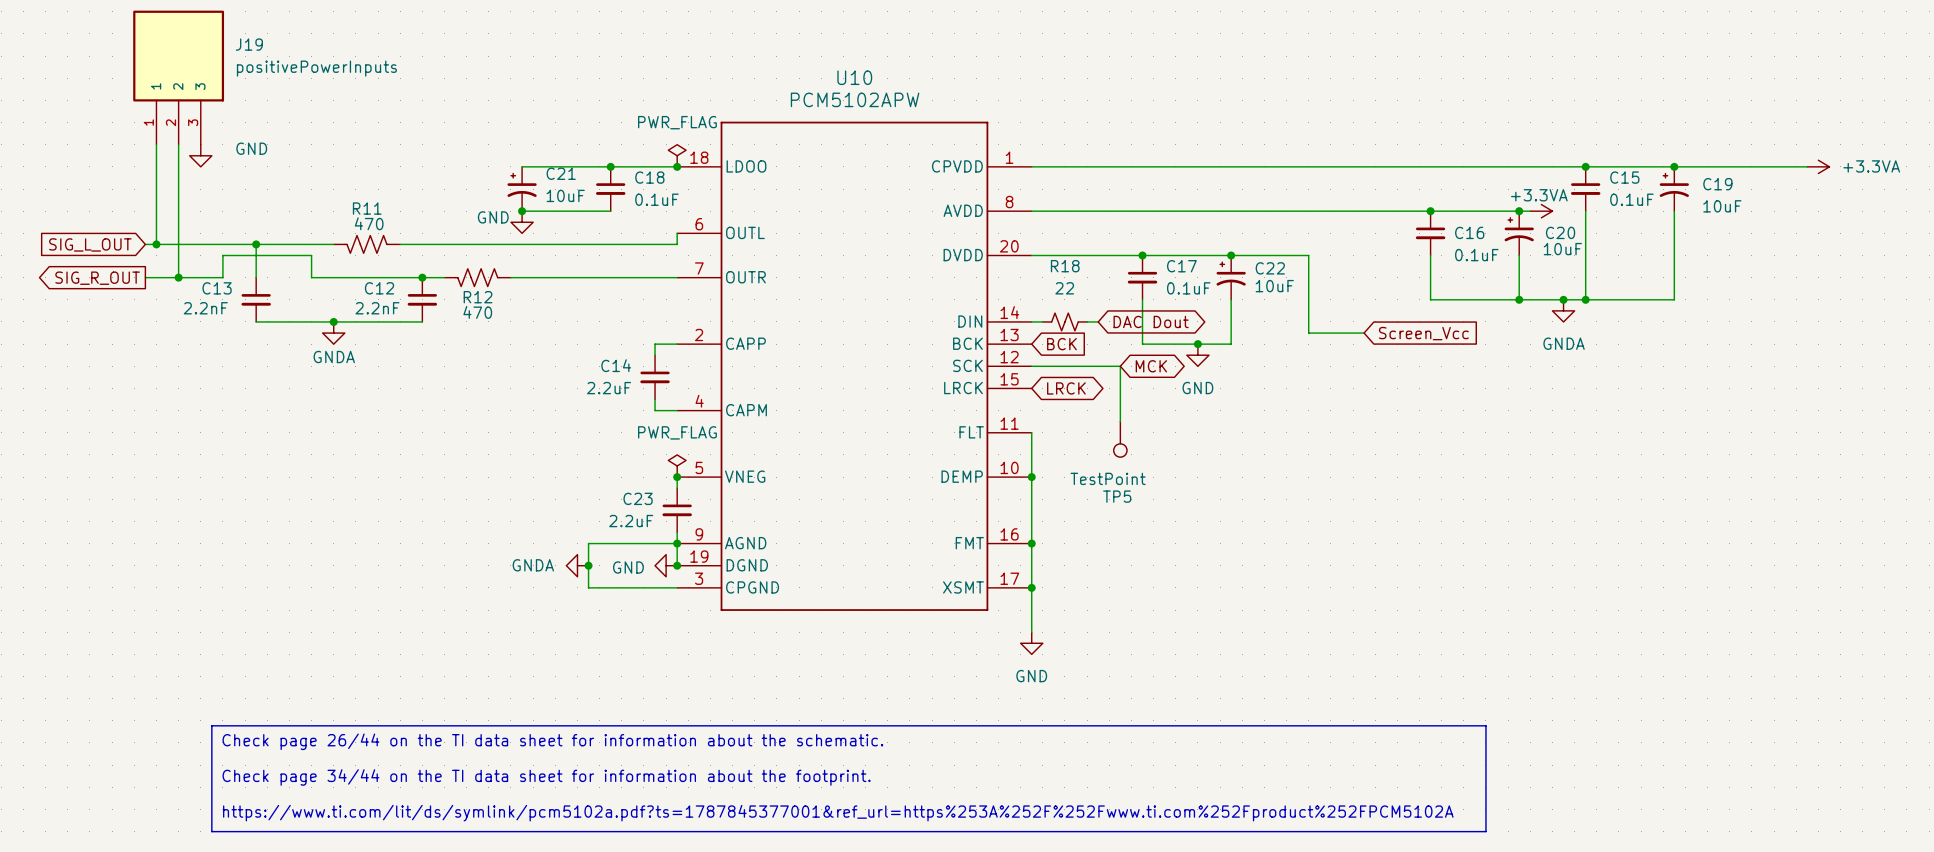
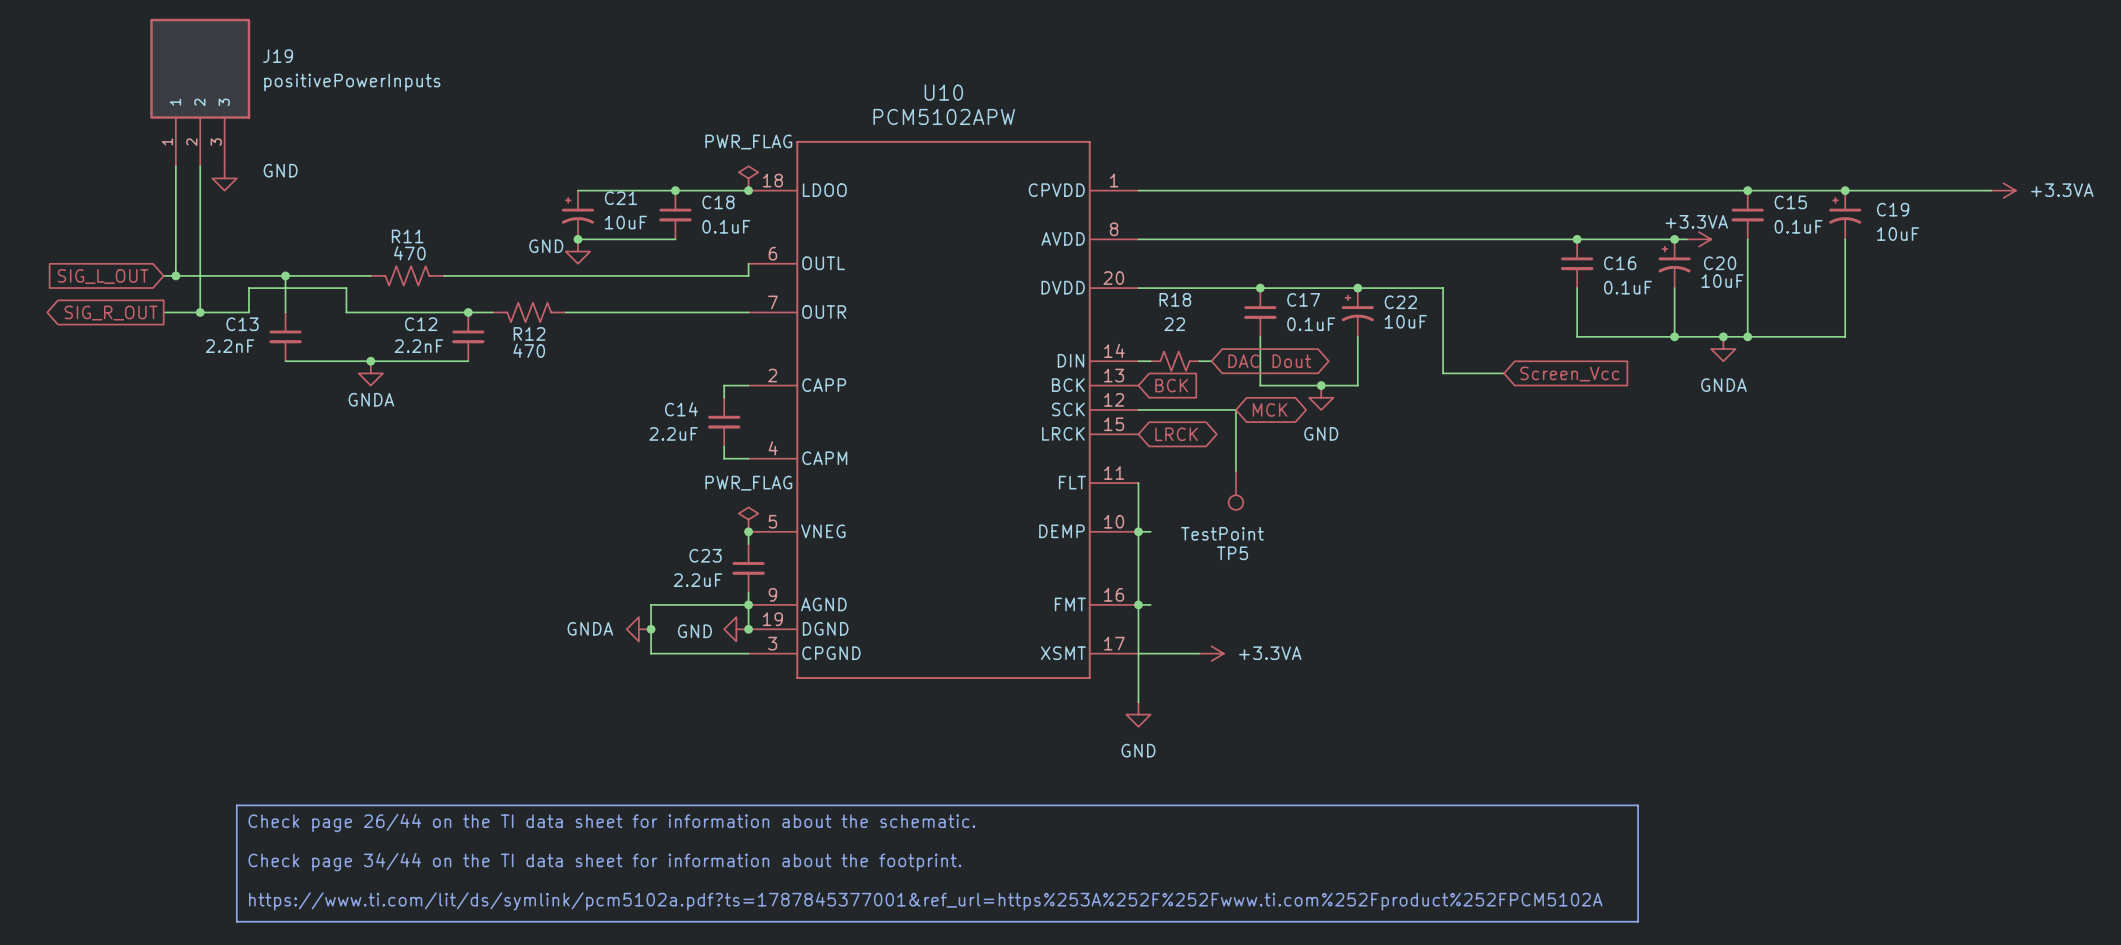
wire: none -> (1138, 531) (1150, 531)
wire: none -> (1138, 604) (1150, 604)
wire: none -> (1138, 653) (1199, 653)
junction: (1031, 587) -> none
power symbol: none -> +3.3VA (1211, 653)

